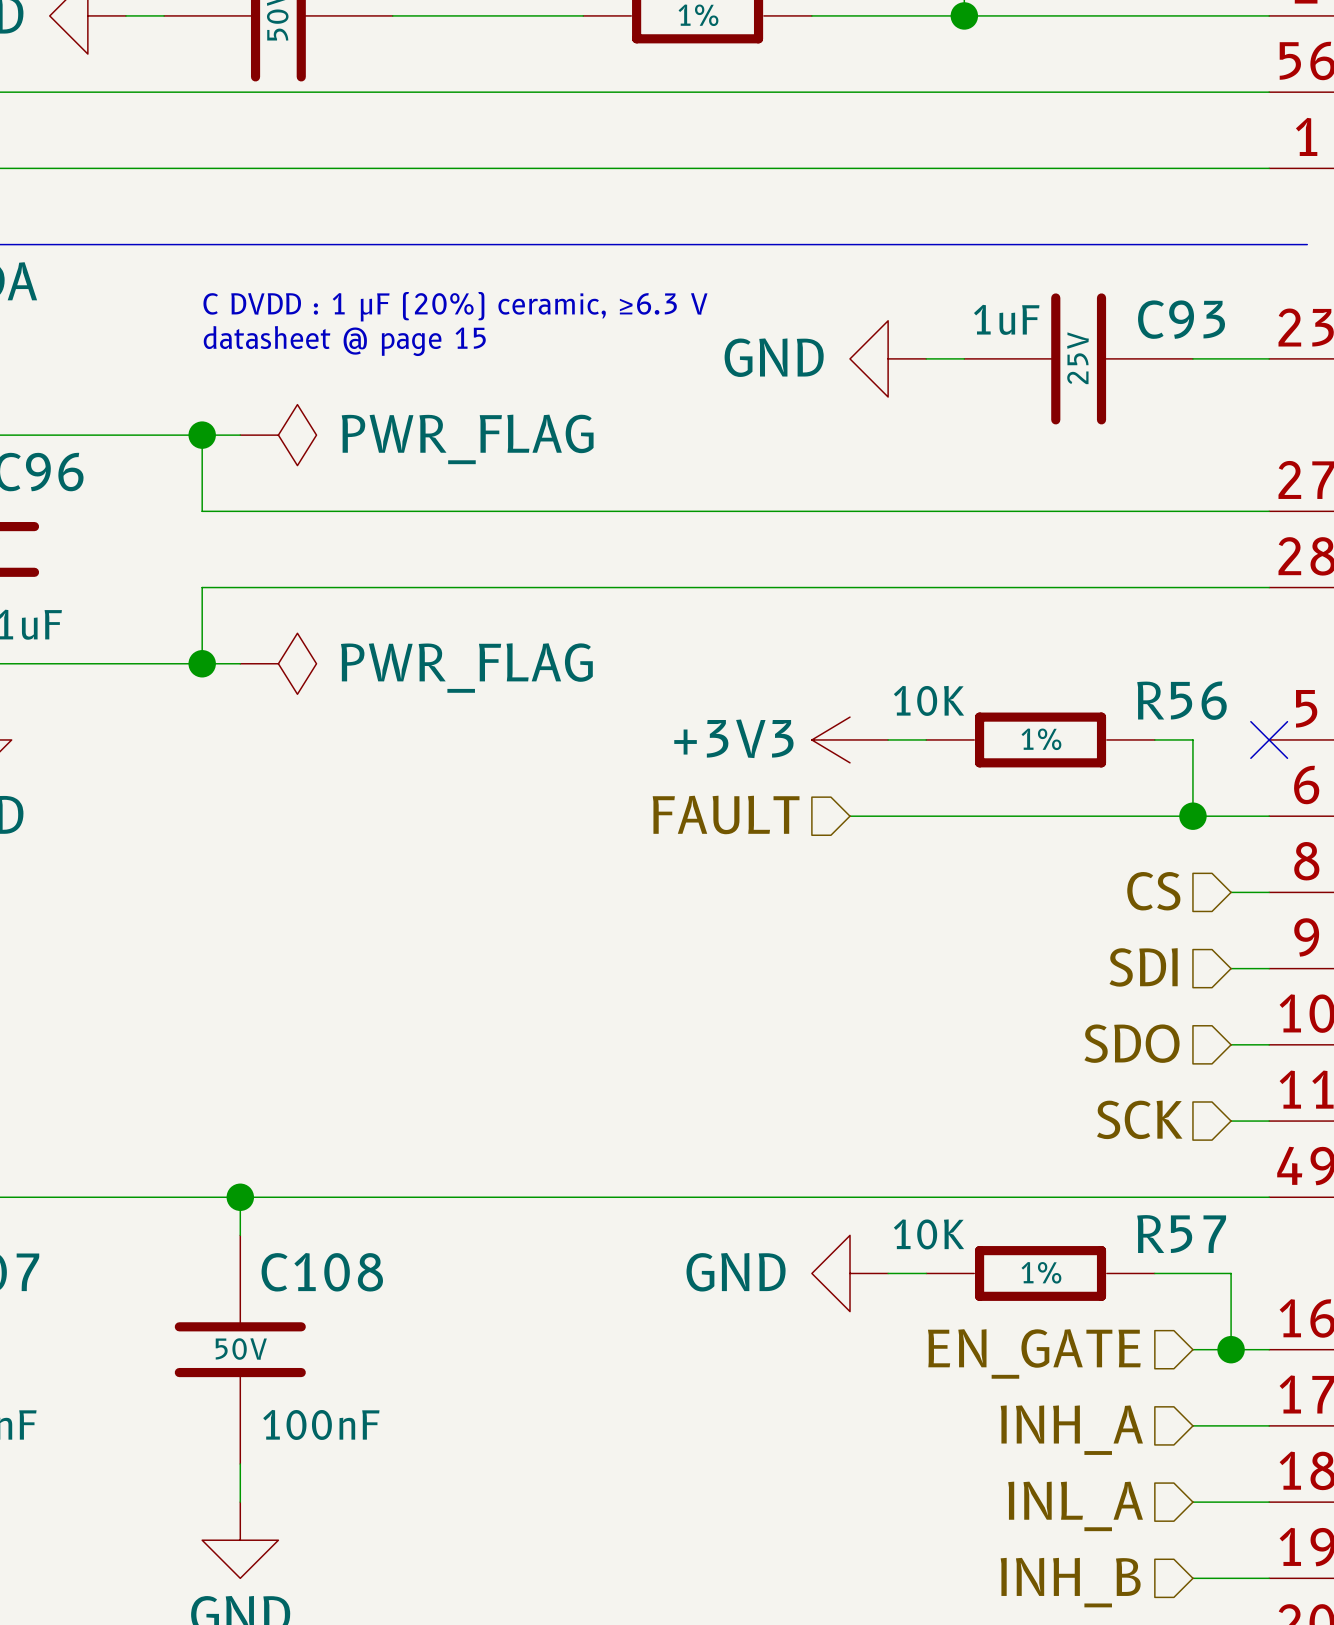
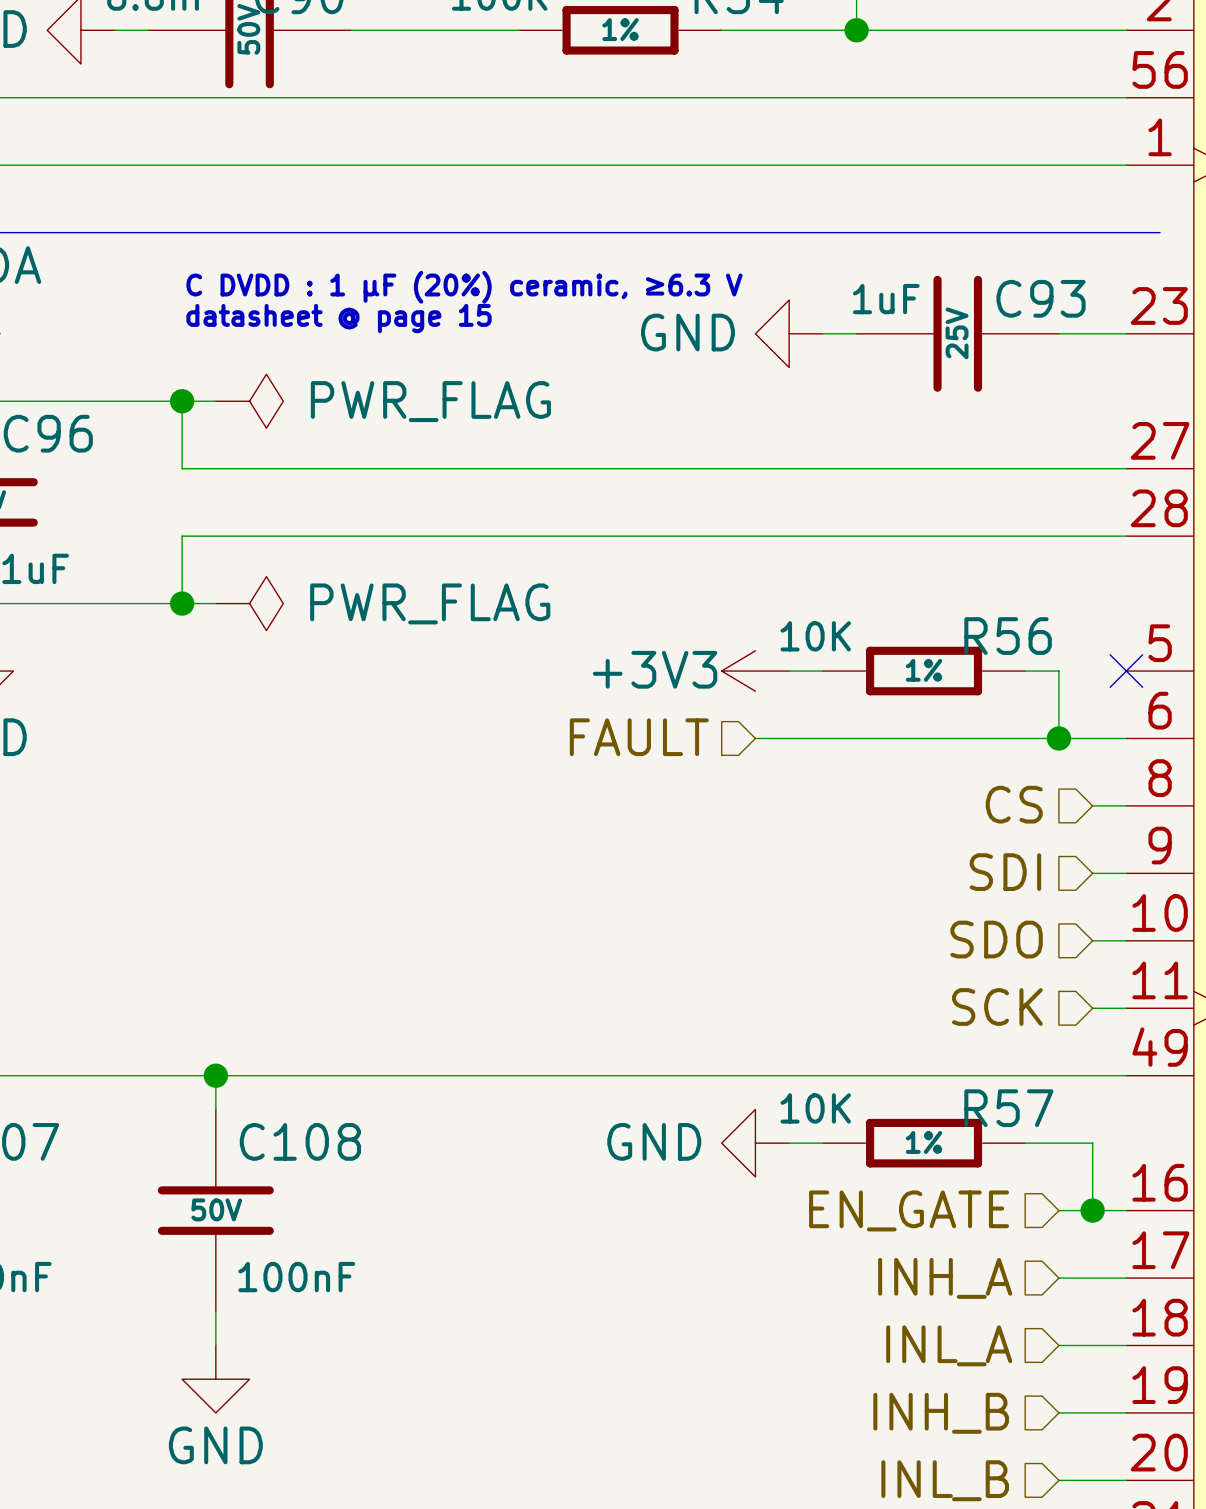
R56 name position: R56 (1181, 700) -> R56 (1008, 636)
R57 name position: R57 (1181, 1234) -> R57 (1008, 1108)

